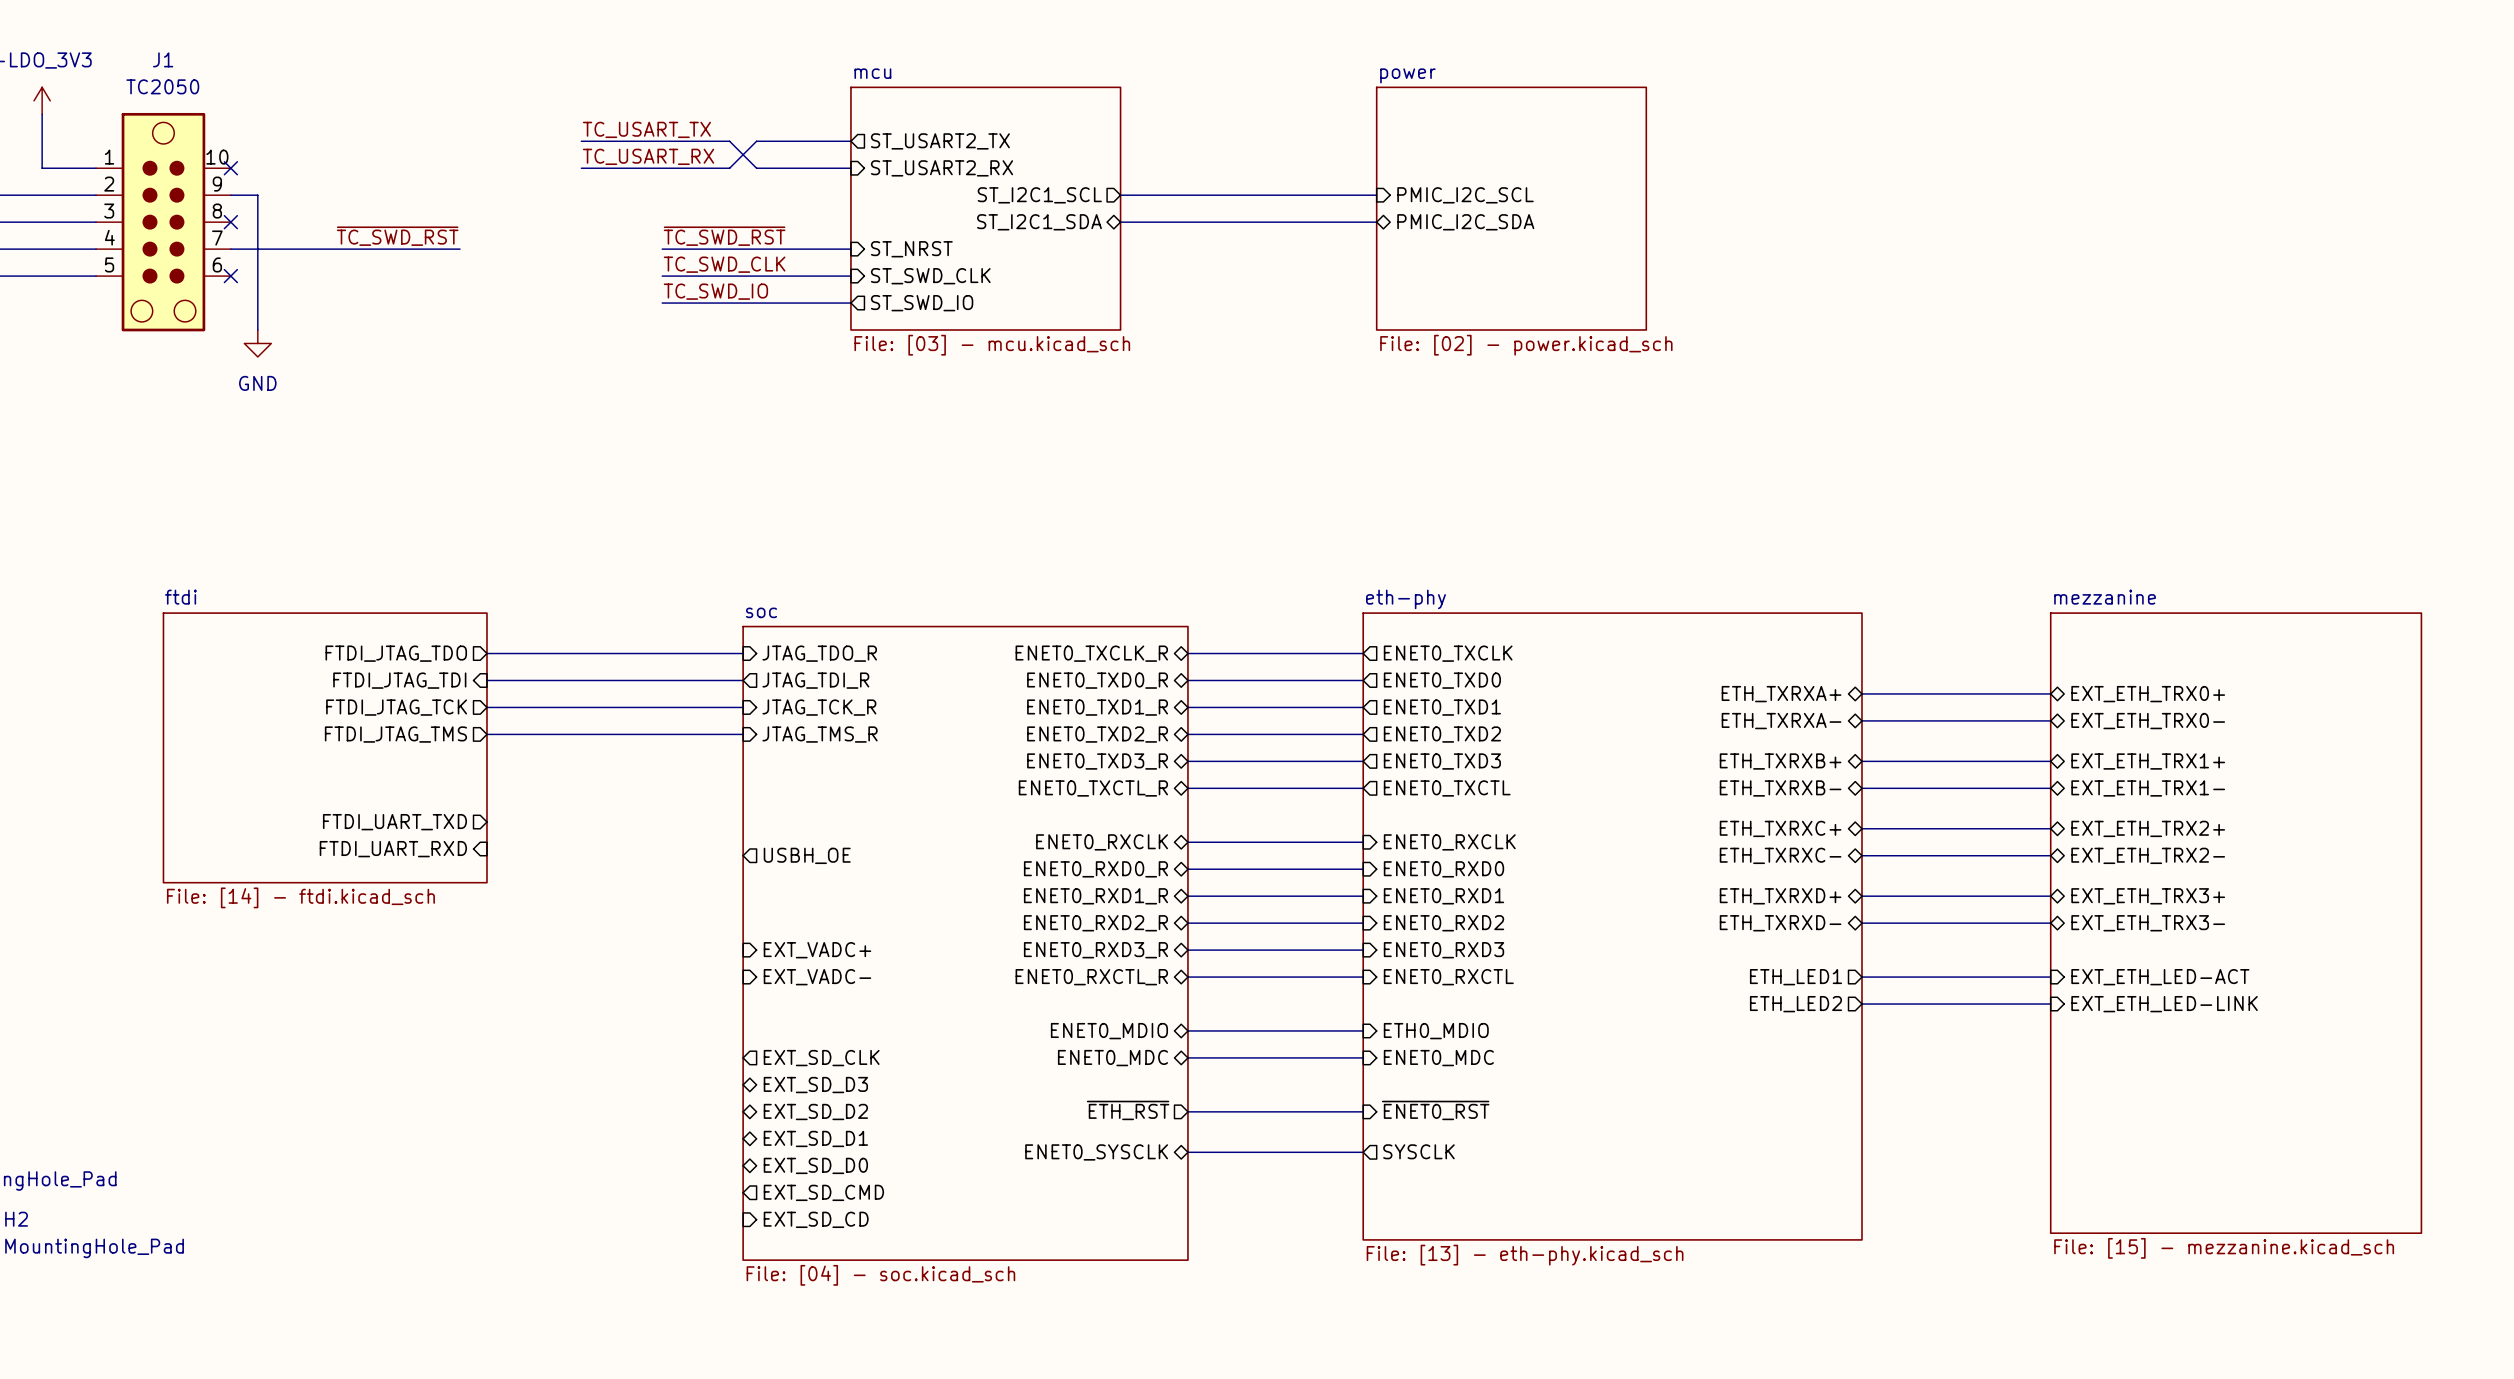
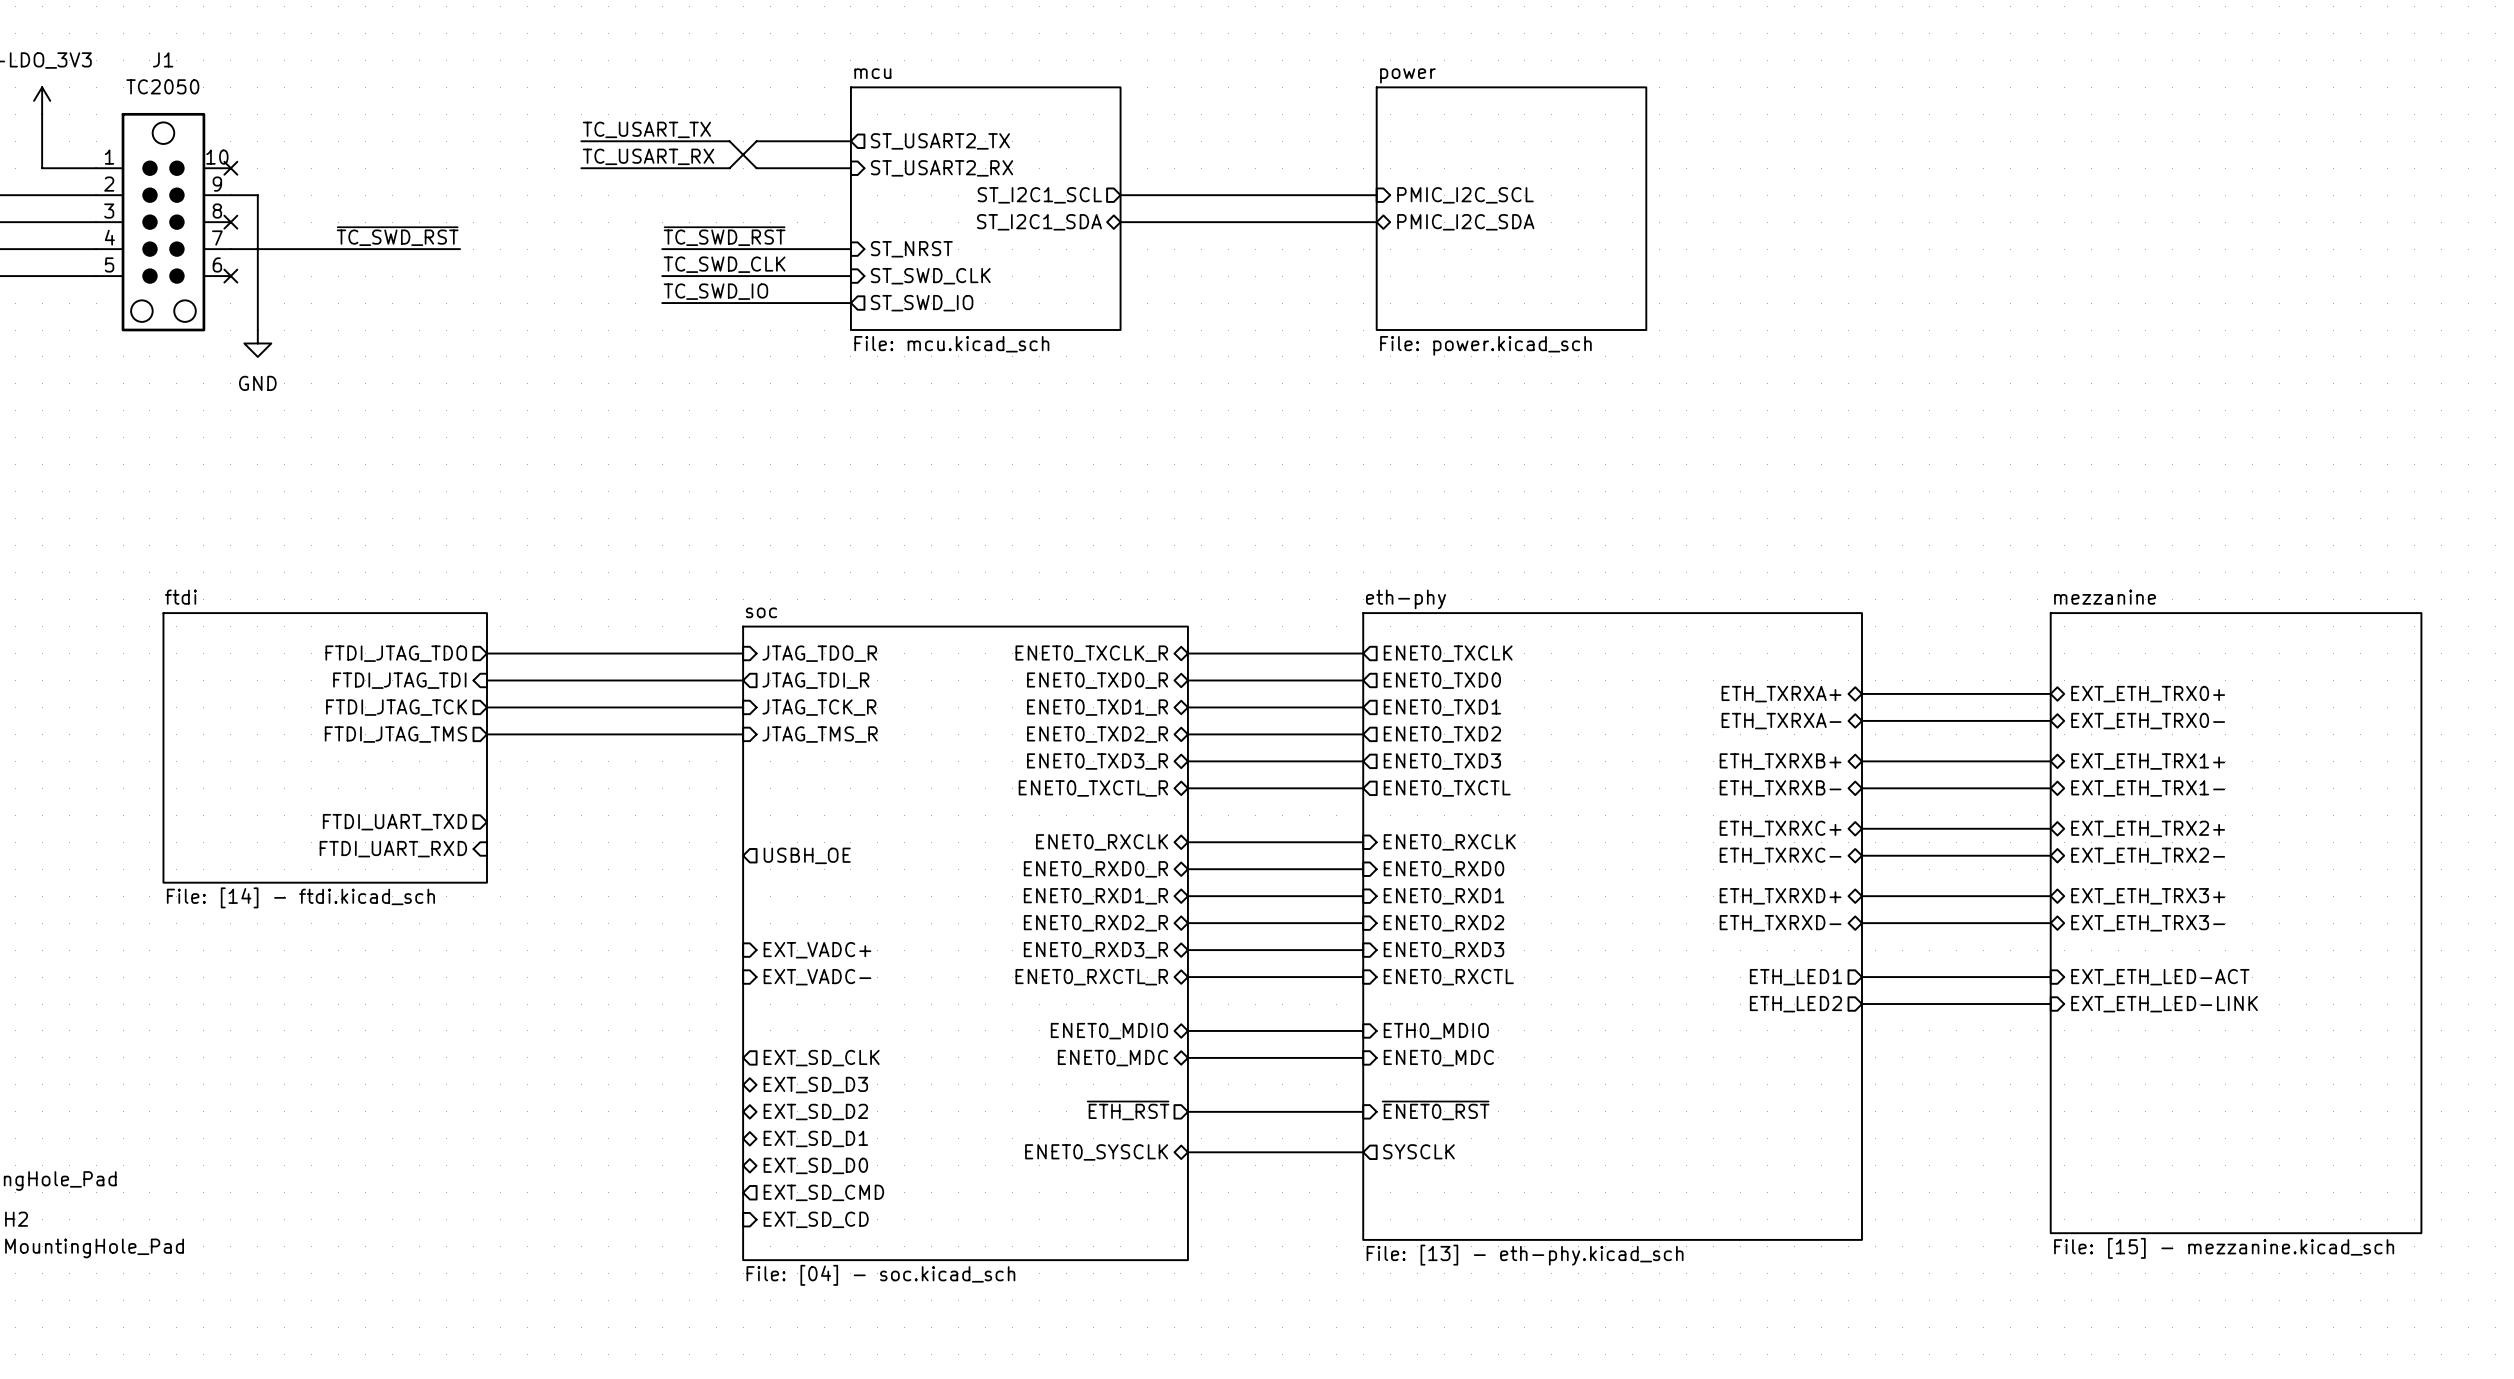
sheet mcu value: File: [03] - mcu.kicad_sch (992, 345) -> File: mcu.kicad_sch (951, 344)
sheet power value: File: [02] - power.kicad_sch (1526, 345) -> File: power.kicad_sch (1485, 345)

